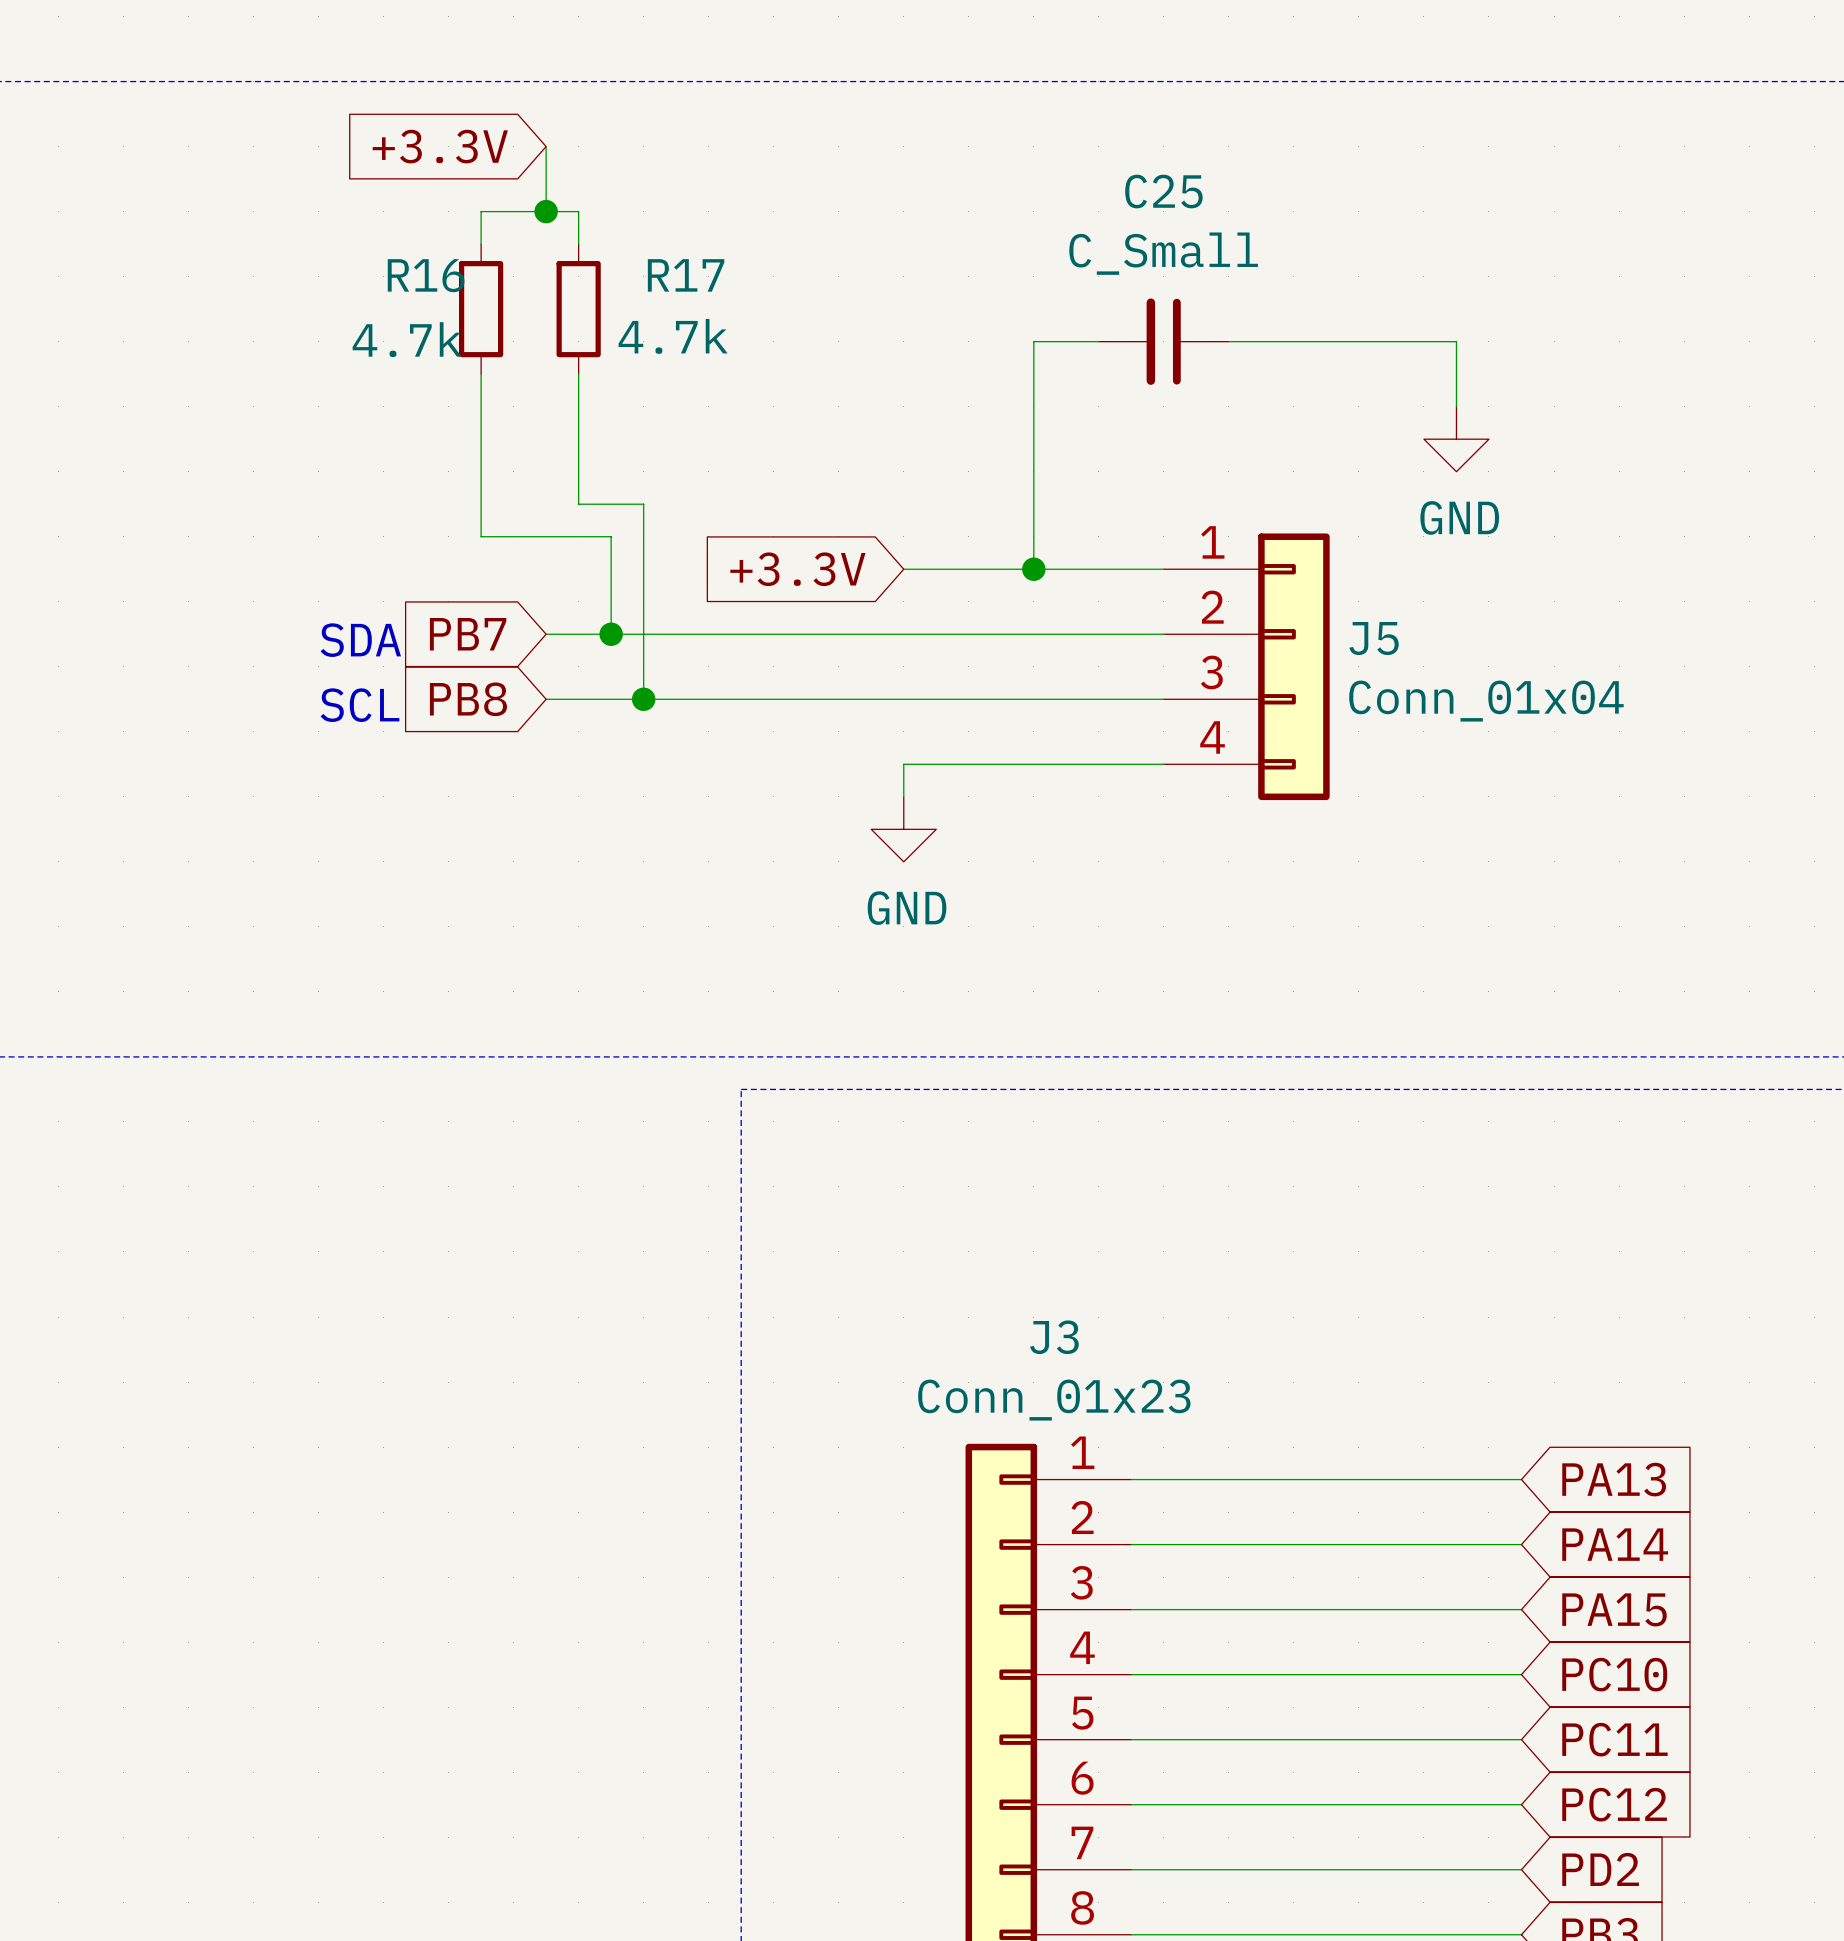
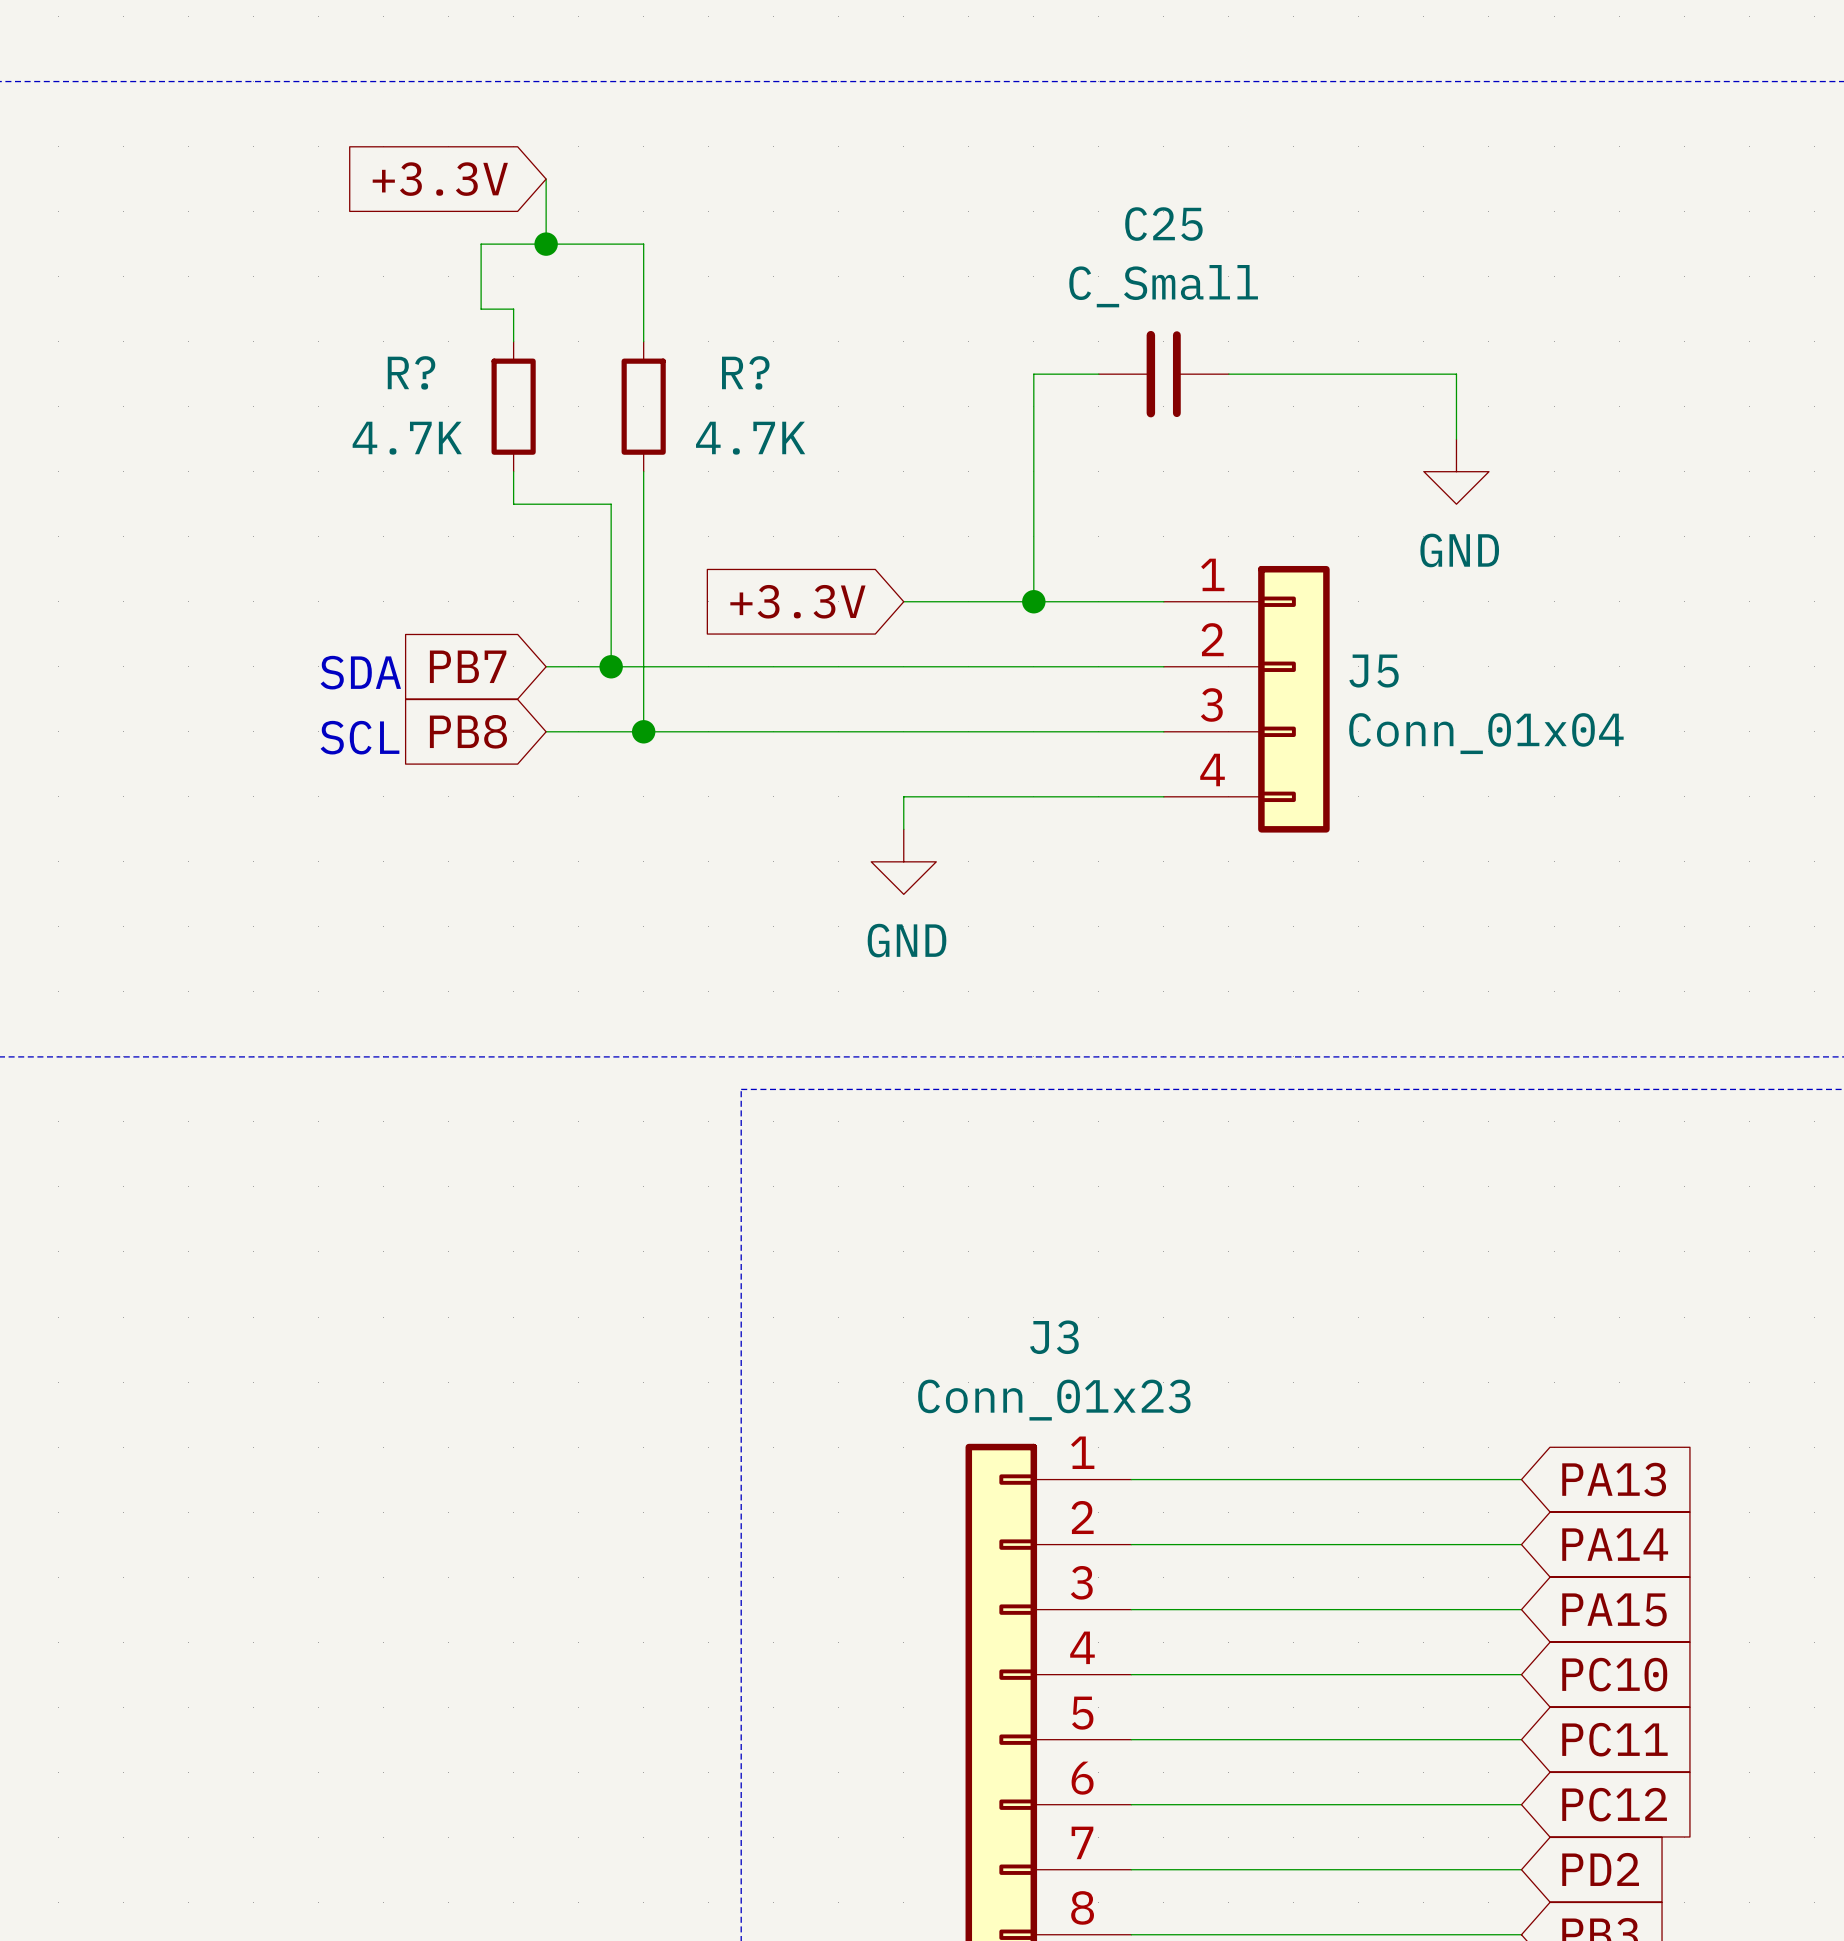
global label position: +3.3V (440, 146) -> +3.3V (440, 179)
wire: (546, 146) (546, 179) -> (546, 211) (546, 244)
junction position: (546, 211) -> (546, 244)
wire: (481, 244) (481, 211) (578, 211) (578, 244) -> none
R16: 4.7k (481, 309) -> none
R17: 4.7k (578, 309) -> none
wire: none -> (513, 341) (513, 309) (481, 309) (481, 244) (643, 244) (643, 341)
wire: (1098, 341) (1033, 341) (1033, 374) -> (1098, 374) (1033, 374)
C25 position: (1163, 341) -> (1163, 374)
wire: (1228, 341) (1456, 341) (1456, 374) -> (1228, 374) (1456, 374)
wire: (481, 374) (481, 536) (611, 536) -> (611, 504) (611, 536)
wire: (578, 374) (578, 504) -> (513, 471) (513, 504) (578, 504)
R?: none -> 4.7K (513, 406)
R?: none -> 4.7K (643, 406)
power symbol position: GND (1456, 439) -> GND (1456, 471)
wire: (611, 504) (643, 504) -> (643, 471) (643, 504)
global label position: +3.3V (797, 569) -> +3.3V (797, 601)
wire: (903, 569) (1163, 569) -> (903, 601) (1163, 601)
wire: none -> (1033, 569) (1033, 601)
junction position: (1033, 569) -> (1033, 601)
global label position: PB7 (468, 634) -> PB7 (468, 666)
wire: (546, 634) (1163, 634) -> (546, 666) (1163, 666)
wire: none -> (611, 634) (611, 666)
junction: (611, 634) -> none
text position: SDA (360, 640) -> SDA (360, 672)
junction: none -> (611, 666)
J5 position: (1246, 666) -> (1246, 699)
global label position: PB8 (468, 699) -> PB8 (468, 731)
wire: (546, 699) (1163, 699) -> (546, 731) (1163, 731)
wire: none -> (643, 699) (643, 731)
junction: (643, 699) -> none
text position: SCL (360, 705) -> SCL (360, 737)
junction: none -> (643, 731)
wire: (1163, 764) (903, 764) (903, 796) -> (1163, 796) (903, 796) (903, 829)
power symbol position: GND (903, 829) -> GND (903, 861)

